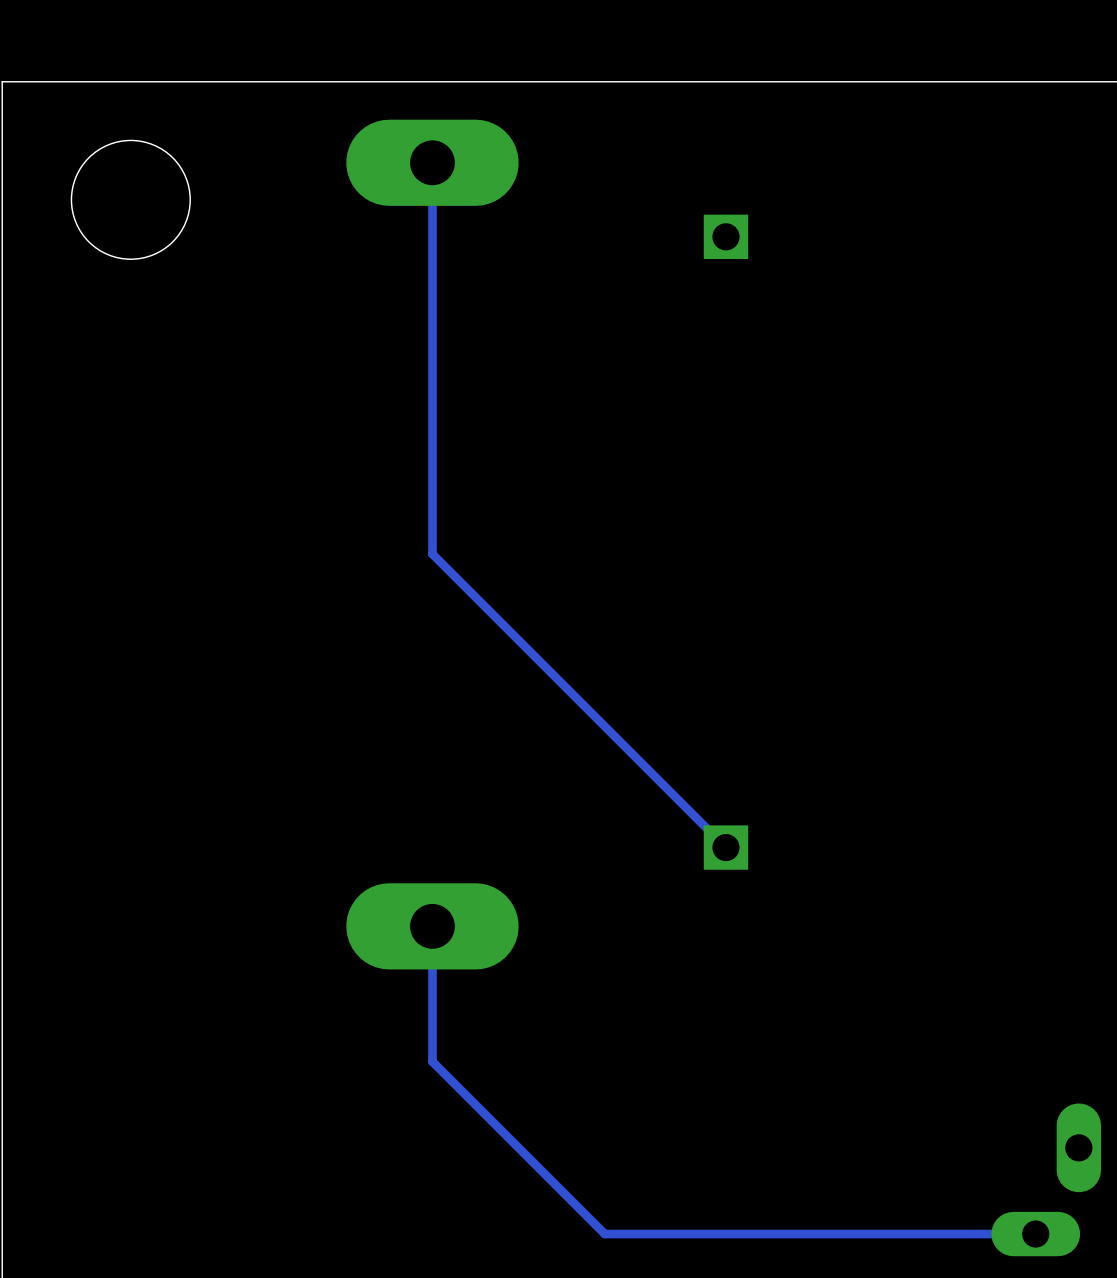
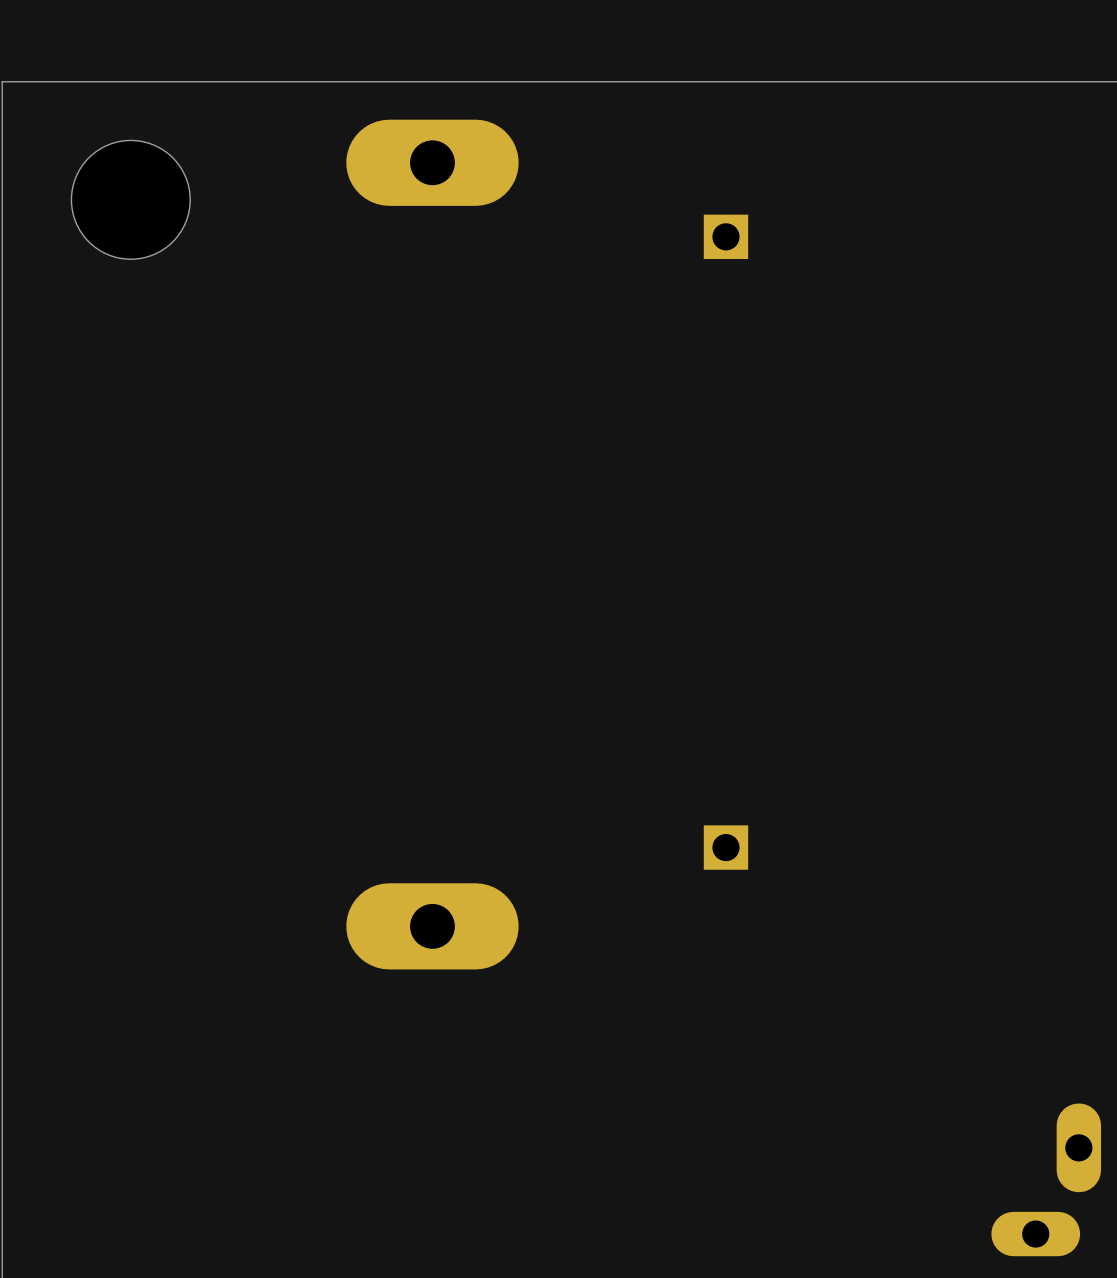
track: (432, 162) (432, 554) (725, 847) -> none
track: (432, 926) (432, 1061) (604, 1234) (1035, 1234) -> none

